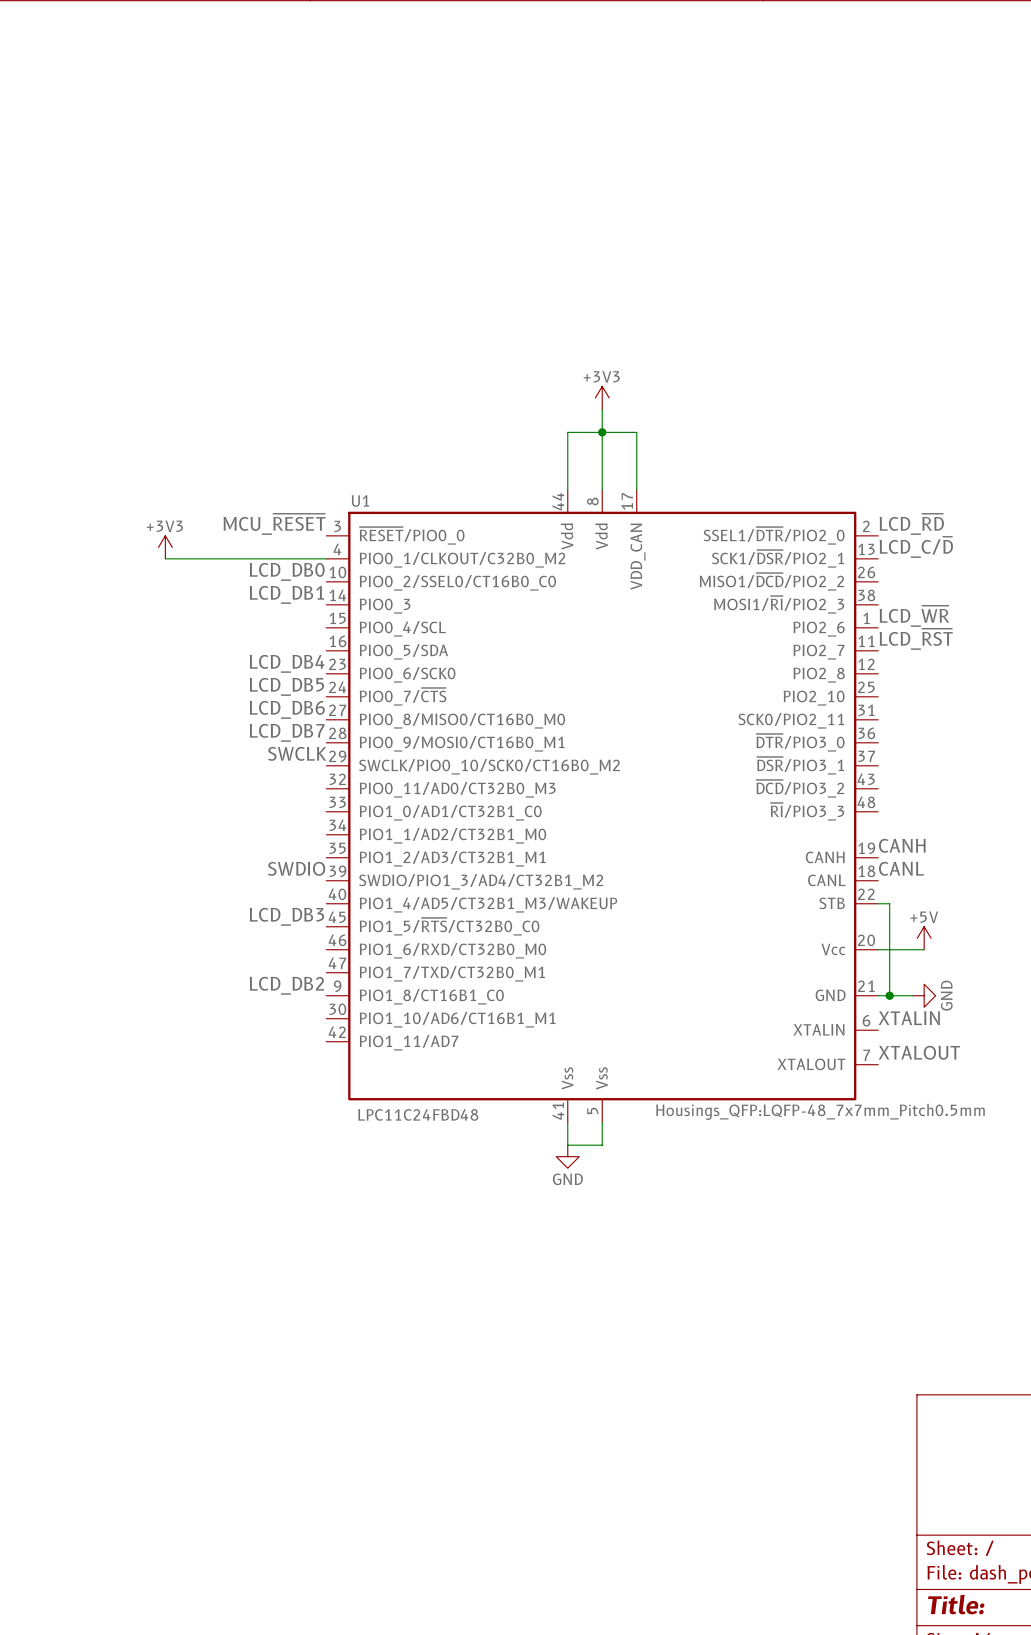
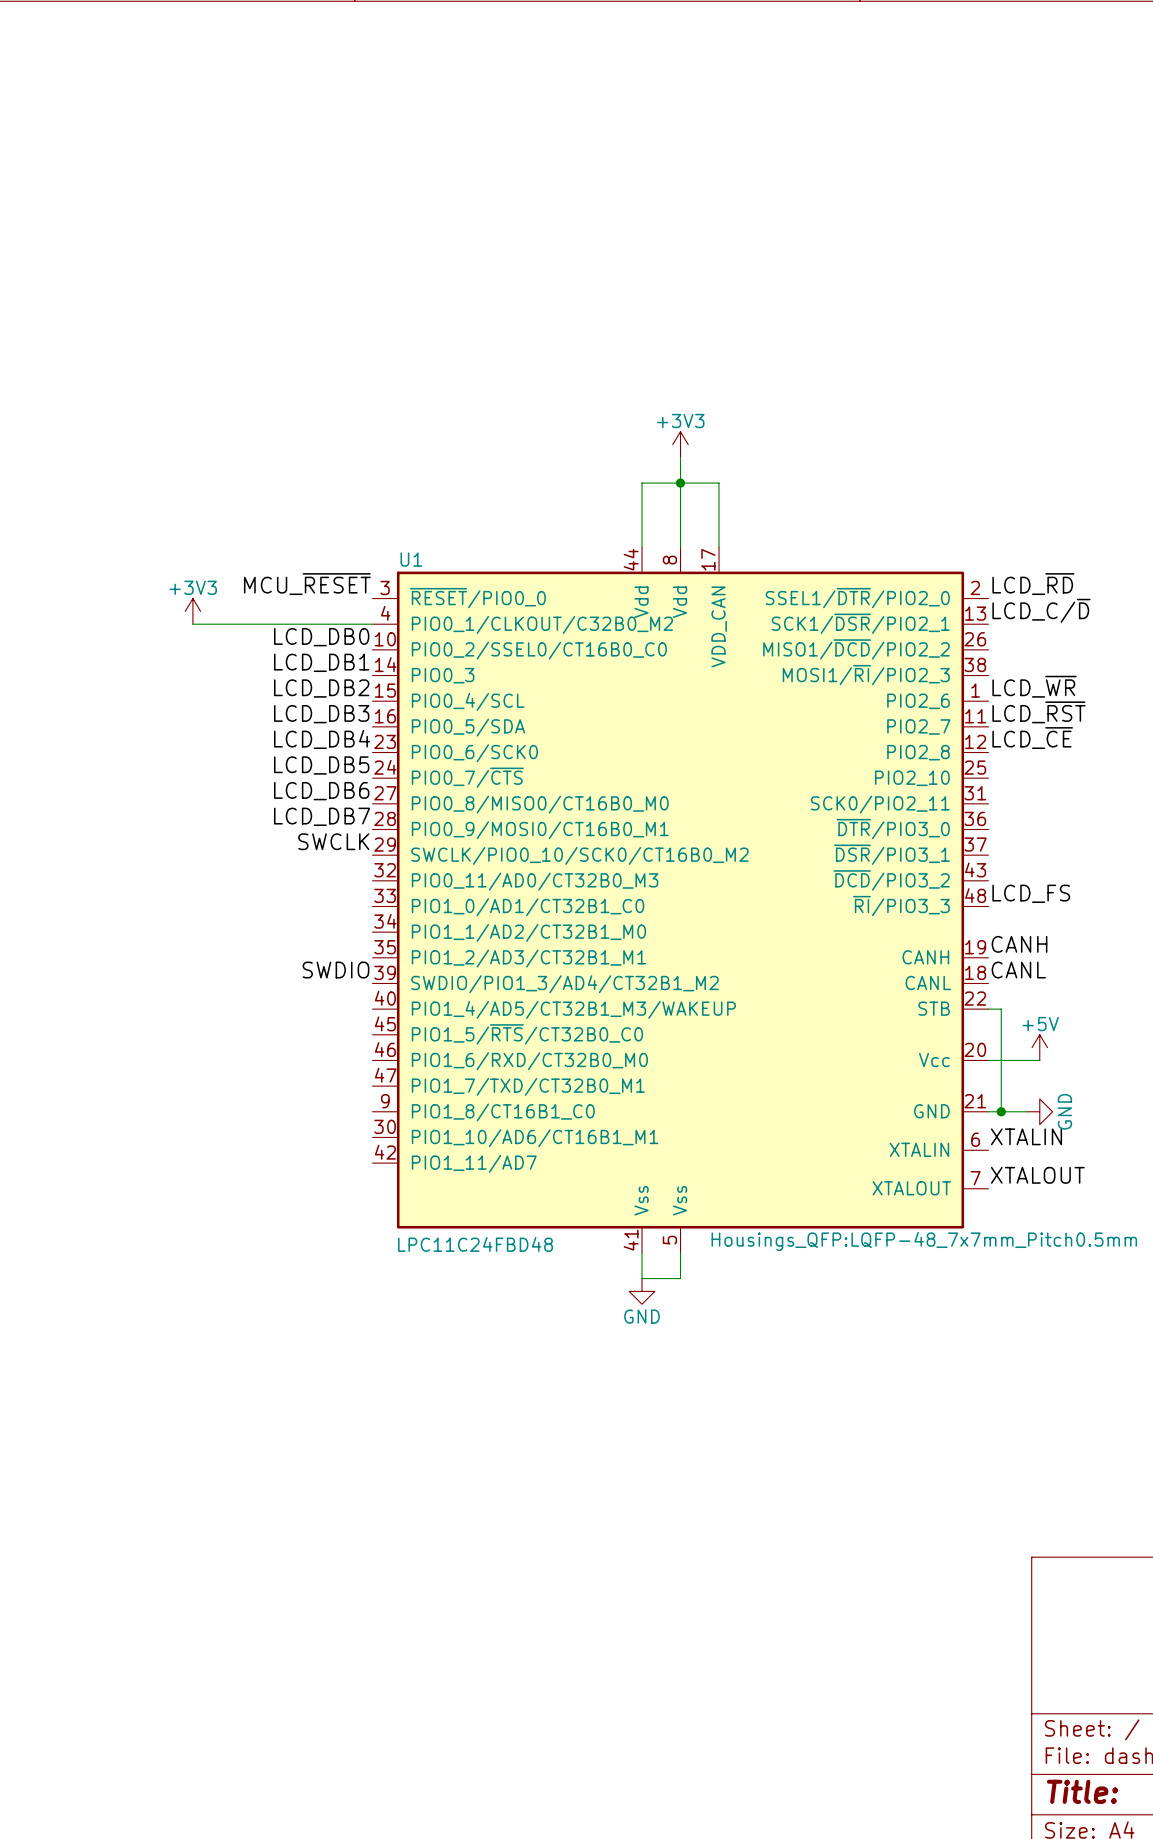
label: none -> LCD_DB2 (321, 688)
label: none -> LCD_DB3 (321, 714)
label: none -> LCD_~{CE} (1032, 738)
label: none -> LCD_FS (1031, 893)
label: LCD_DB3 (286, 916) -> none
label: LCD_DB2 (286, 985) -> none

